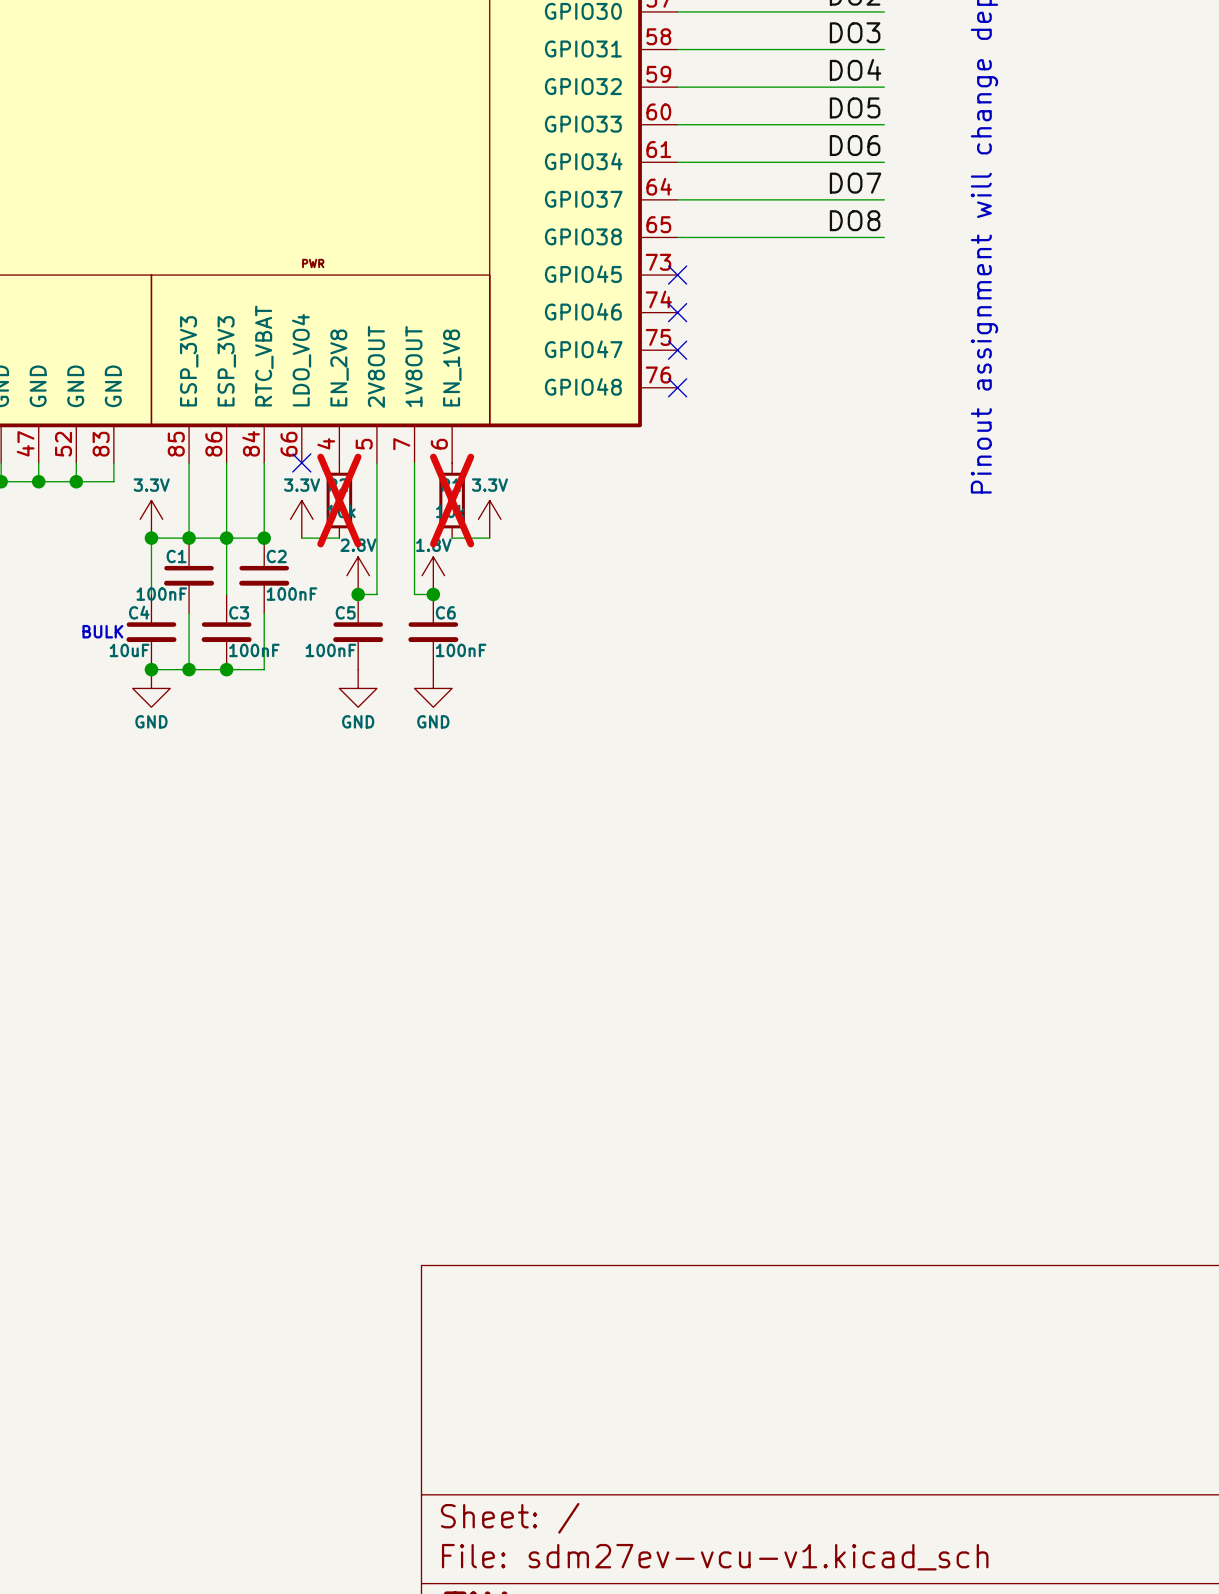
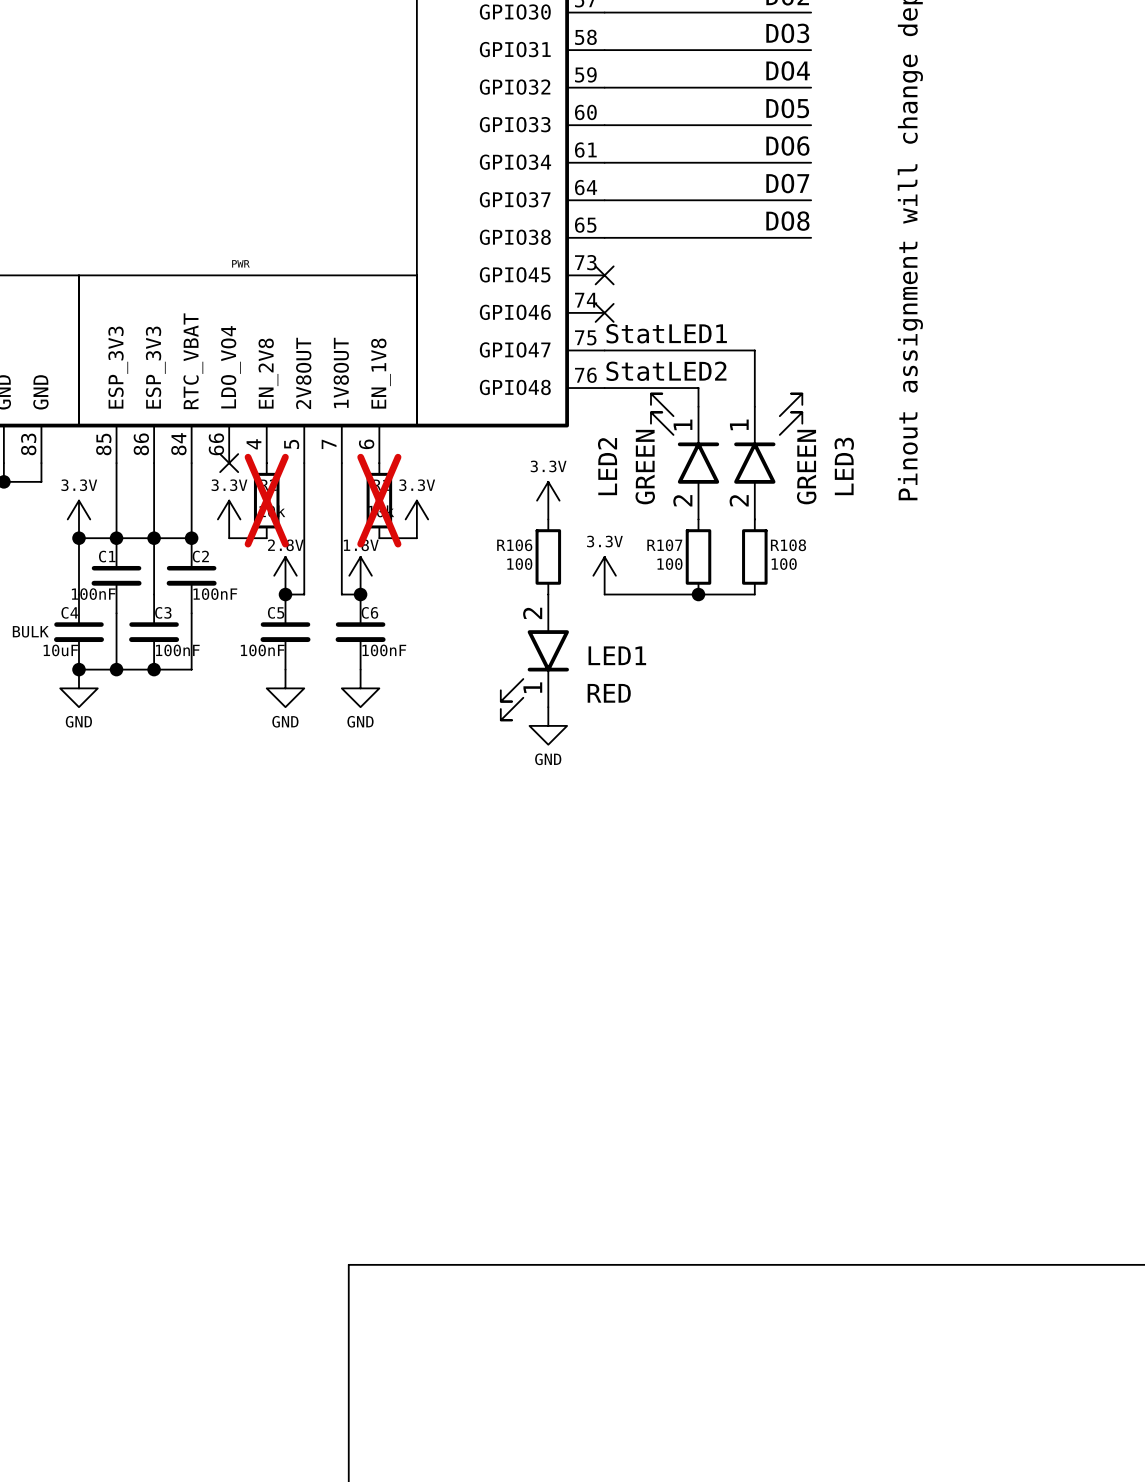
label: none -> StatLED1 (666, 333)
wire: none -> (604, 350) (754, 350) (754, 406)
no-connect mark: (677, 350) -> none
label: none -> StatLED2 (666, 371)
wire: none -> (604, 388) (698, 388) (698, 406)
no-connect mark: (677, 387) -> none
LED2: none -> GREEN (685, 456)
LED3: none -> GREEN (768, 456)
power symbol: none -> 3.3V (548, 500)
R106: none -> 100 (548, 556)
R107: none -> 100 (698, 556)
R108: none -> 100 (754, 556)
power symbol: none -> 3.3V (604, 575)
wire: none -> (604, 594) (754, 594)
junction: none -> (698, 594)
LED1: none -> RED (534, 657)
power symbol: none -> GND (548, 725)

